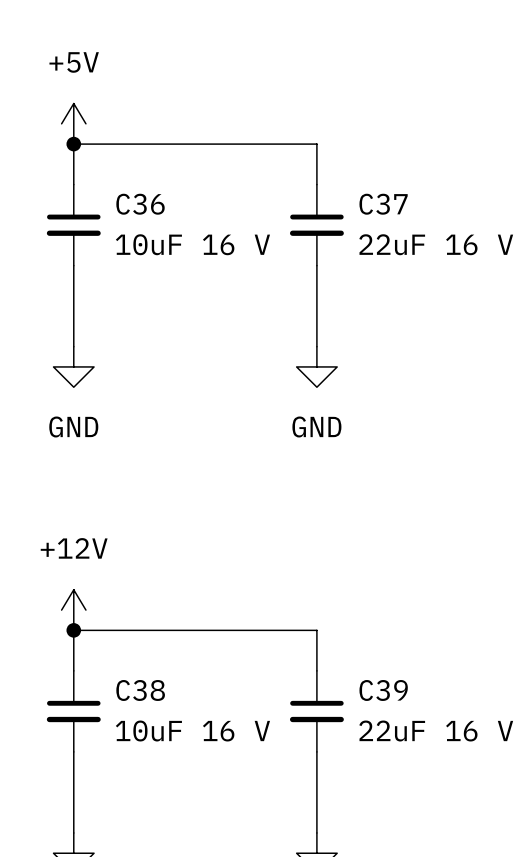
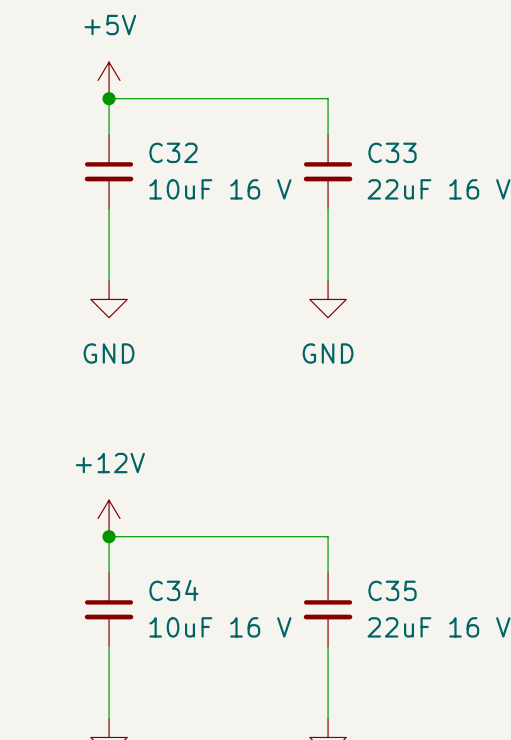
C36 name: C36 (140, 204) -> C32 (173, 152)
C37 name: C37 (383, 204) -> C33 (392, 152)
C38 name: C38 (140, 690) -> C34 (173, 590)
C39 name: C39 (383, 690) -> C35 (392, 590)

